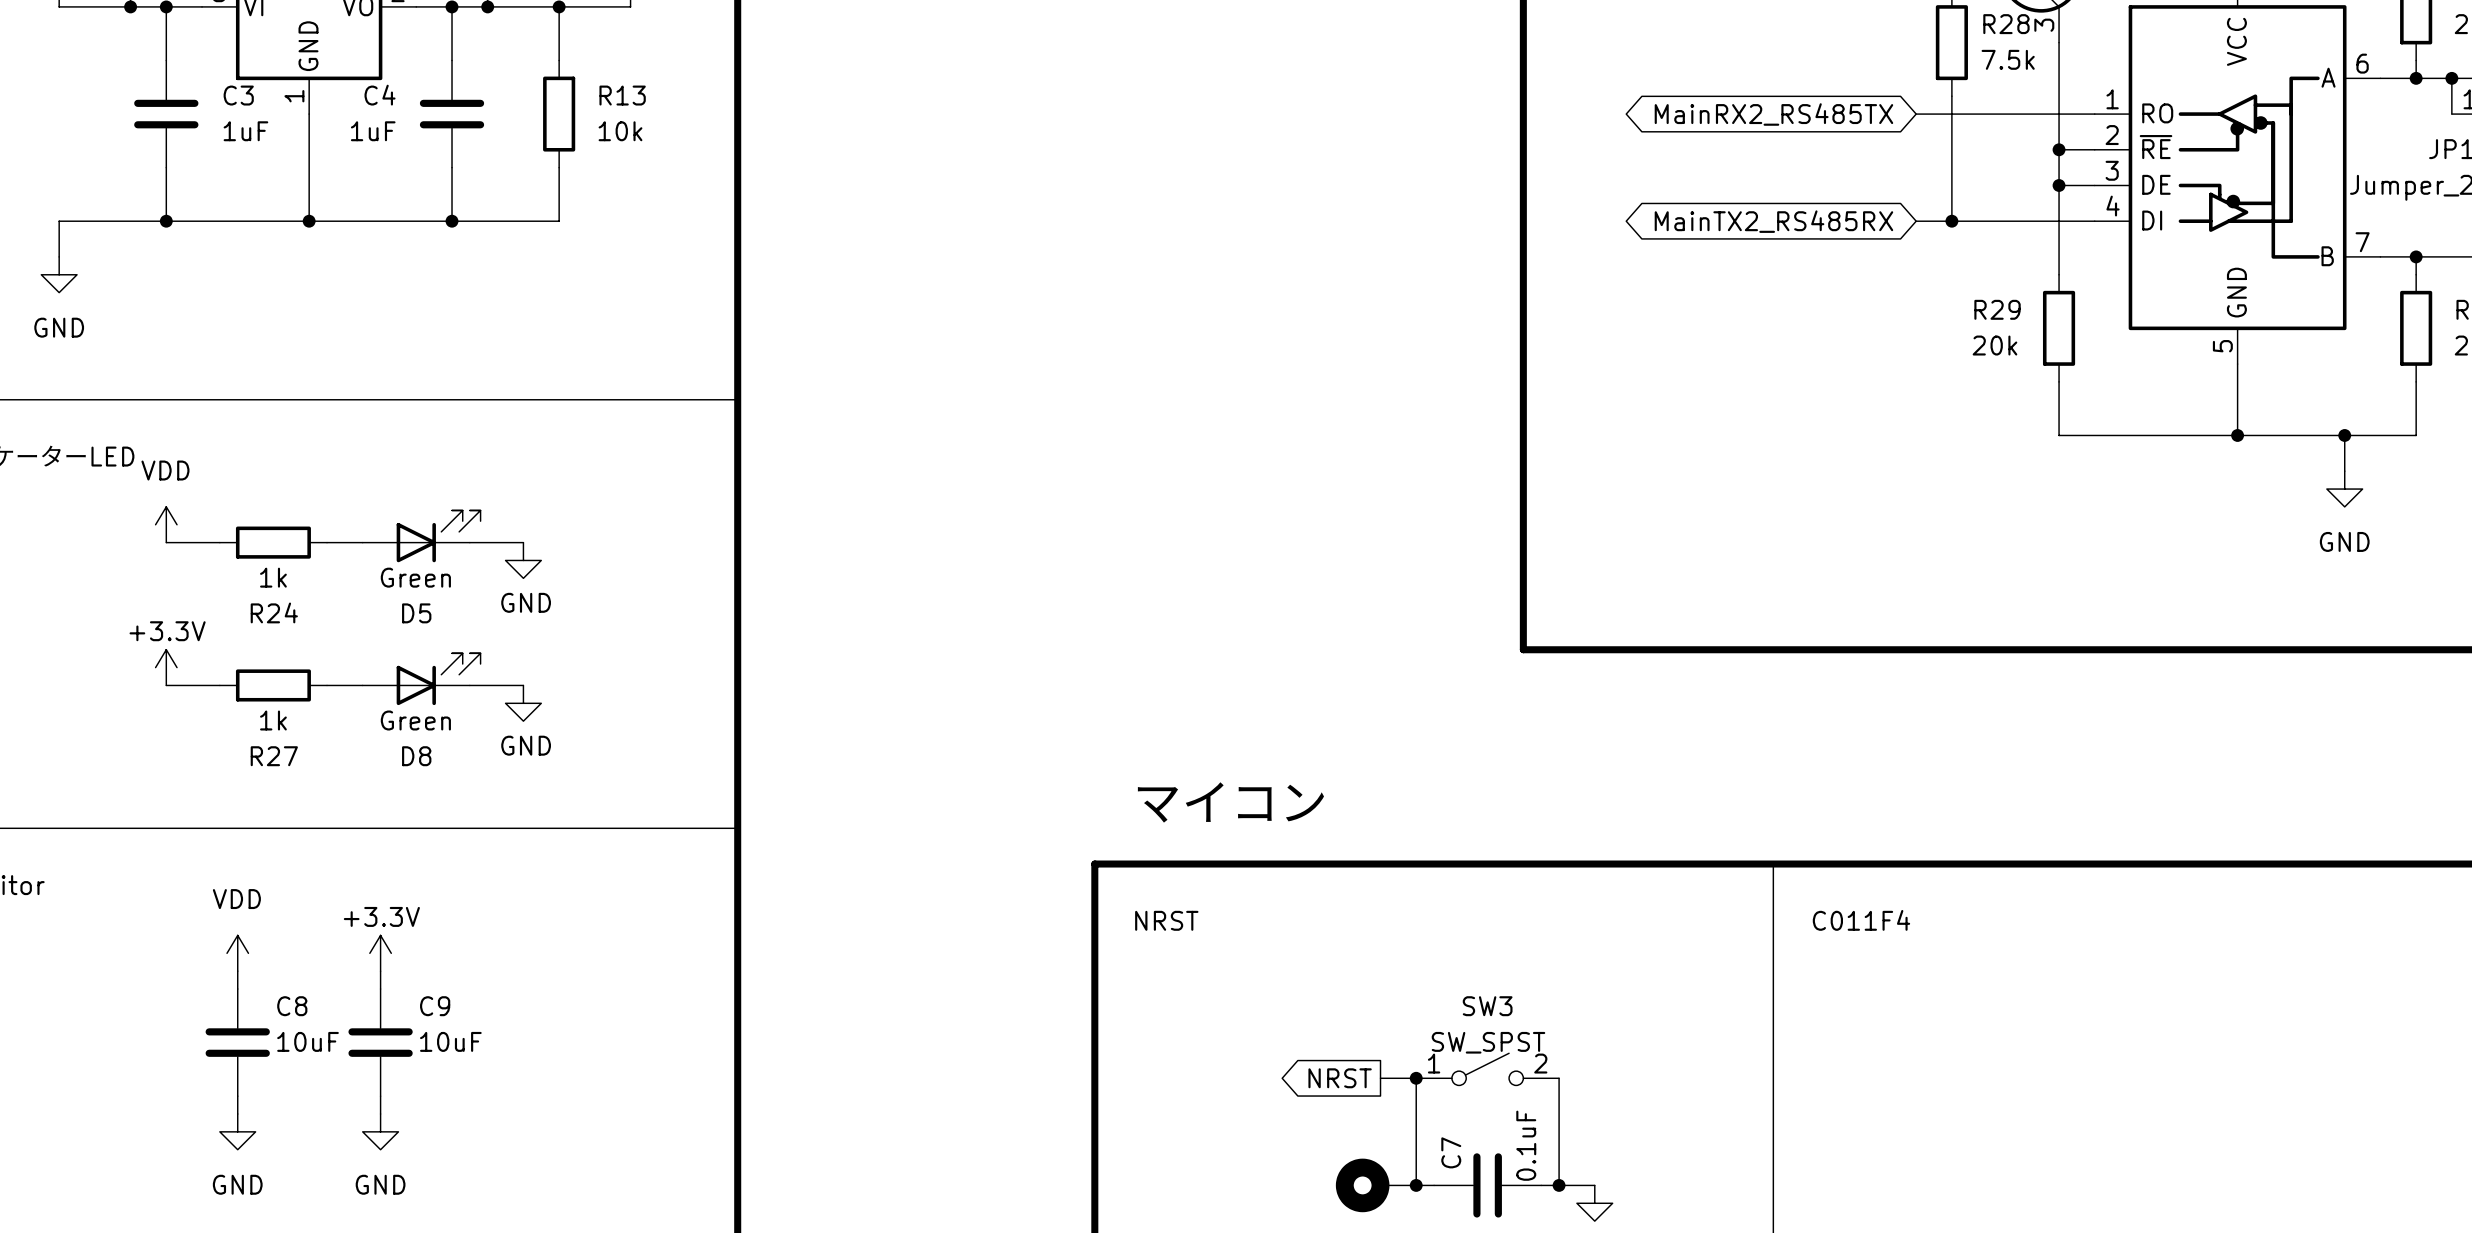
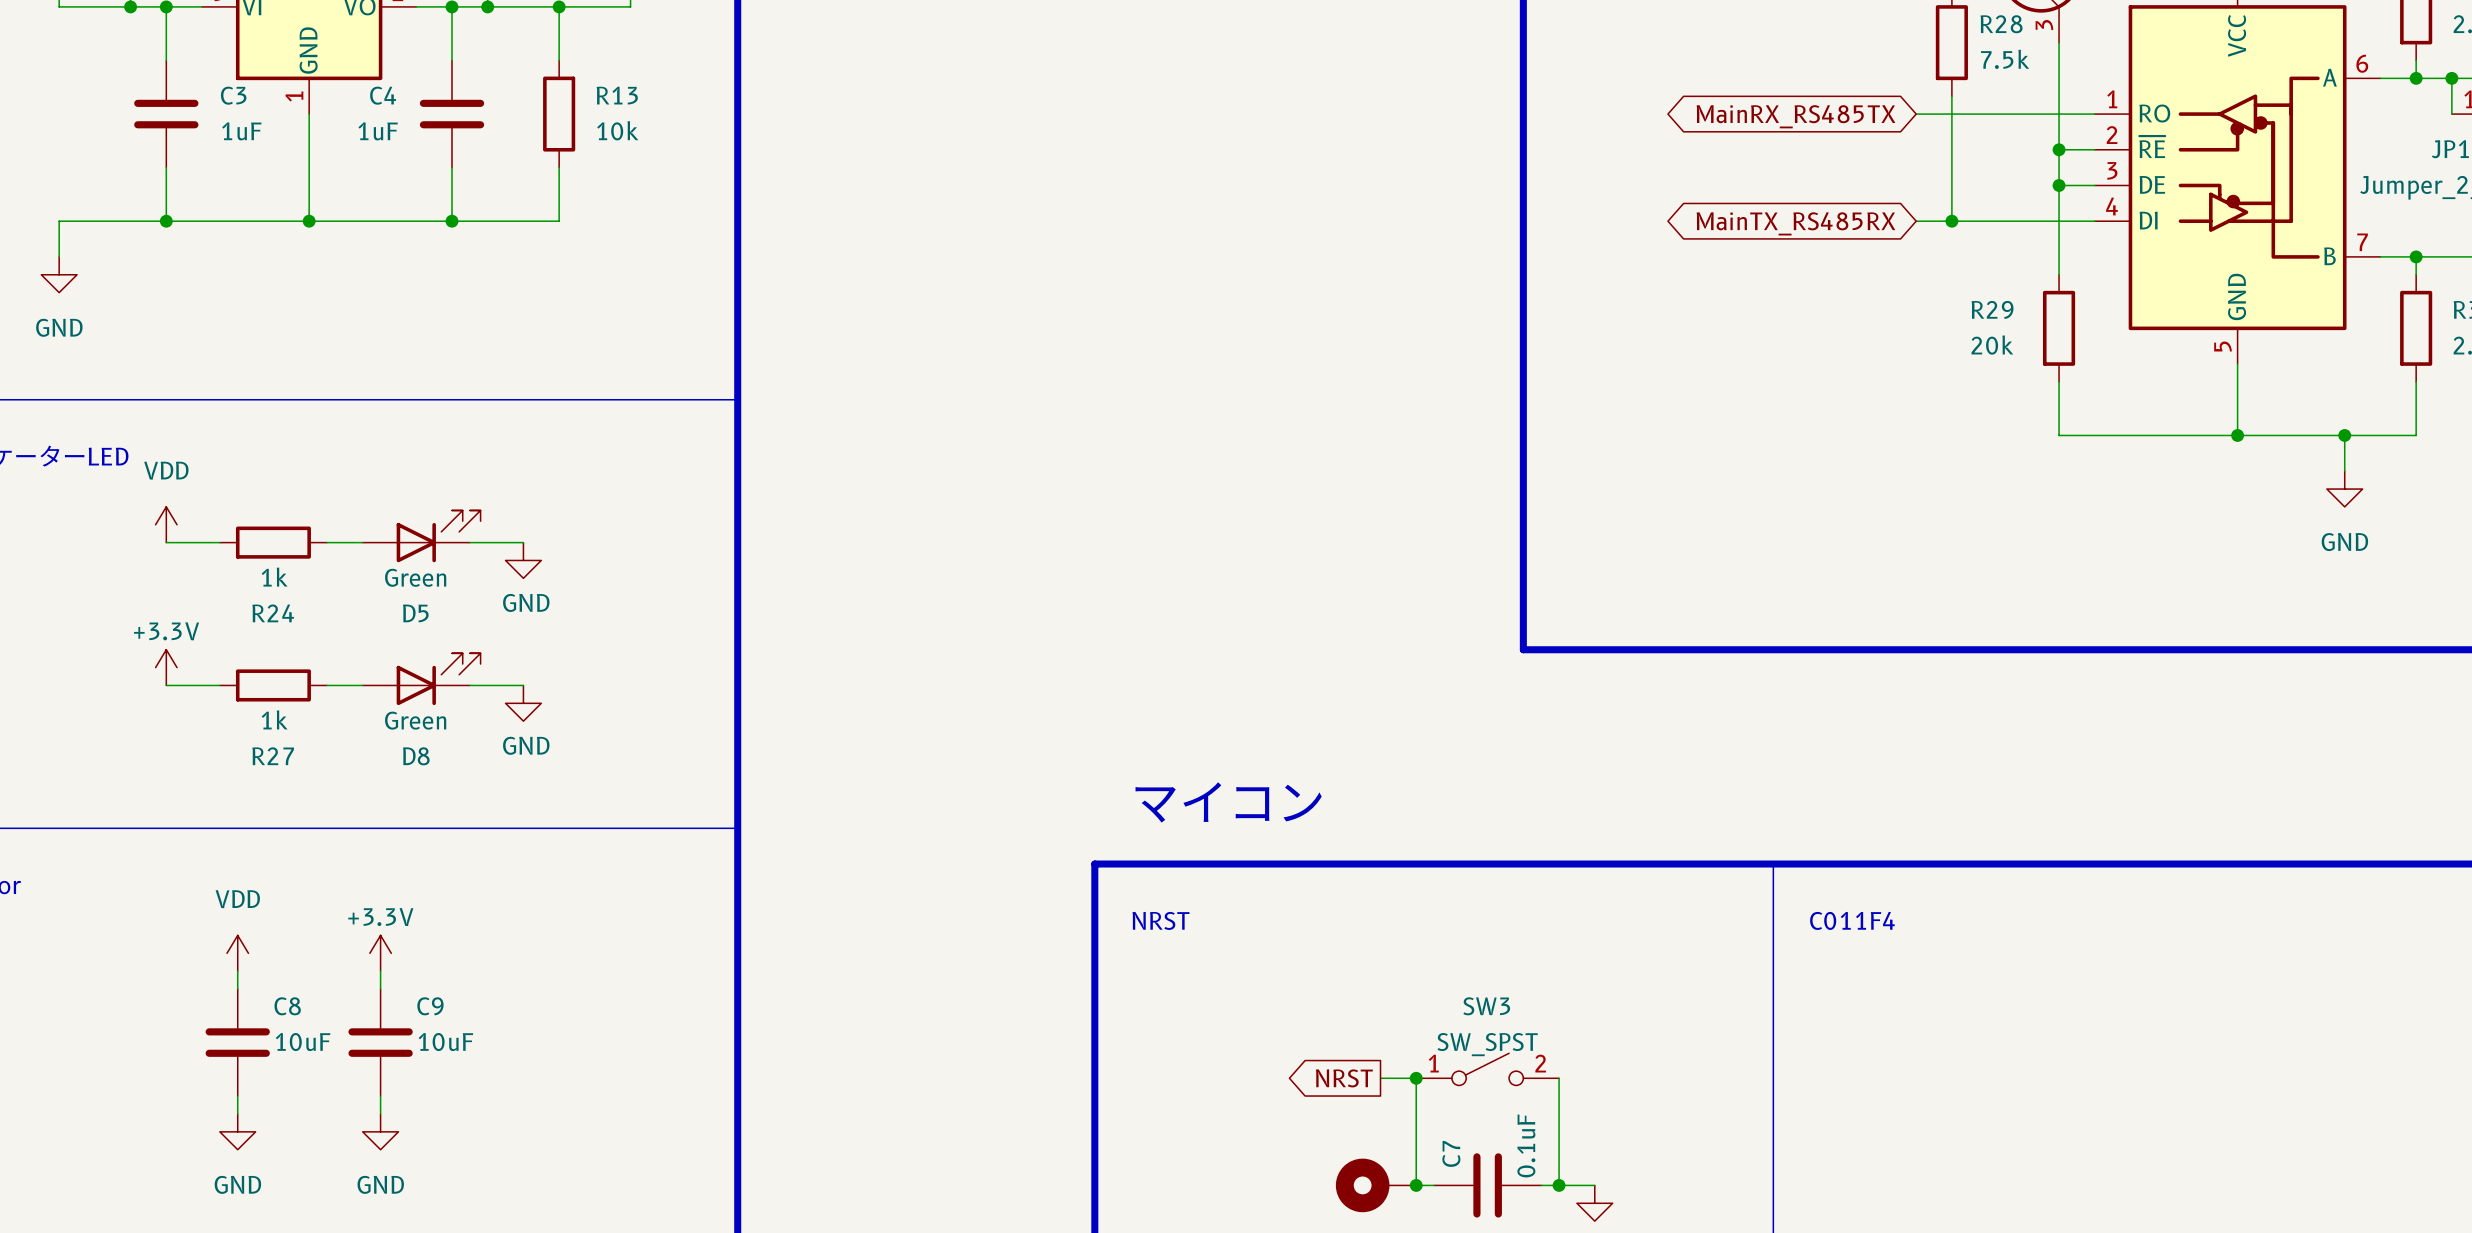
global label: MainRX2_RS485TX (1773, 114) -> MainRX_RS485TX (1795, 116)
global label: MainTX2_RS485RX (1773, 221) -> MainTX_RS485RX (1795, 223)

